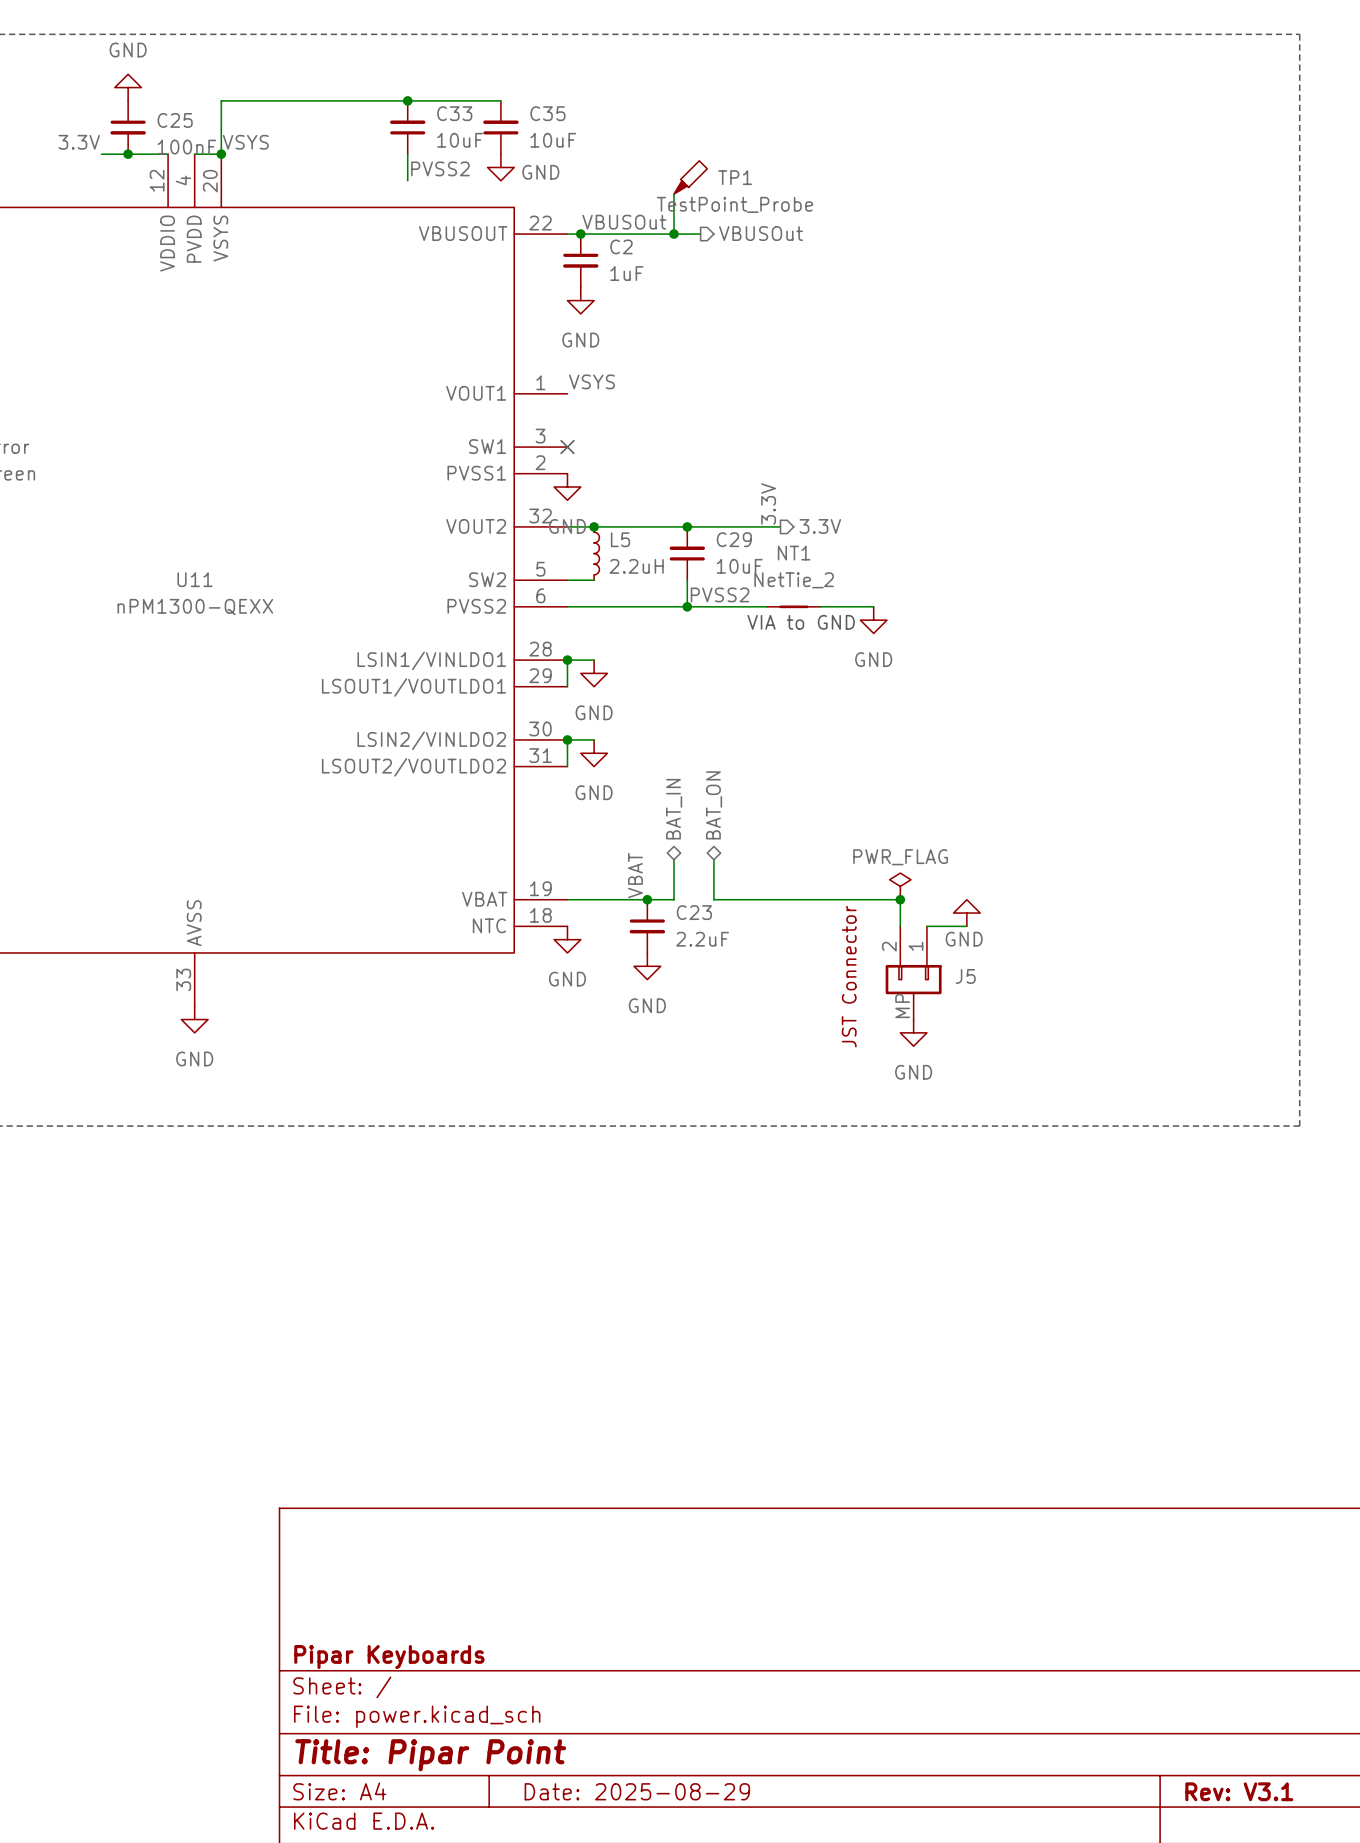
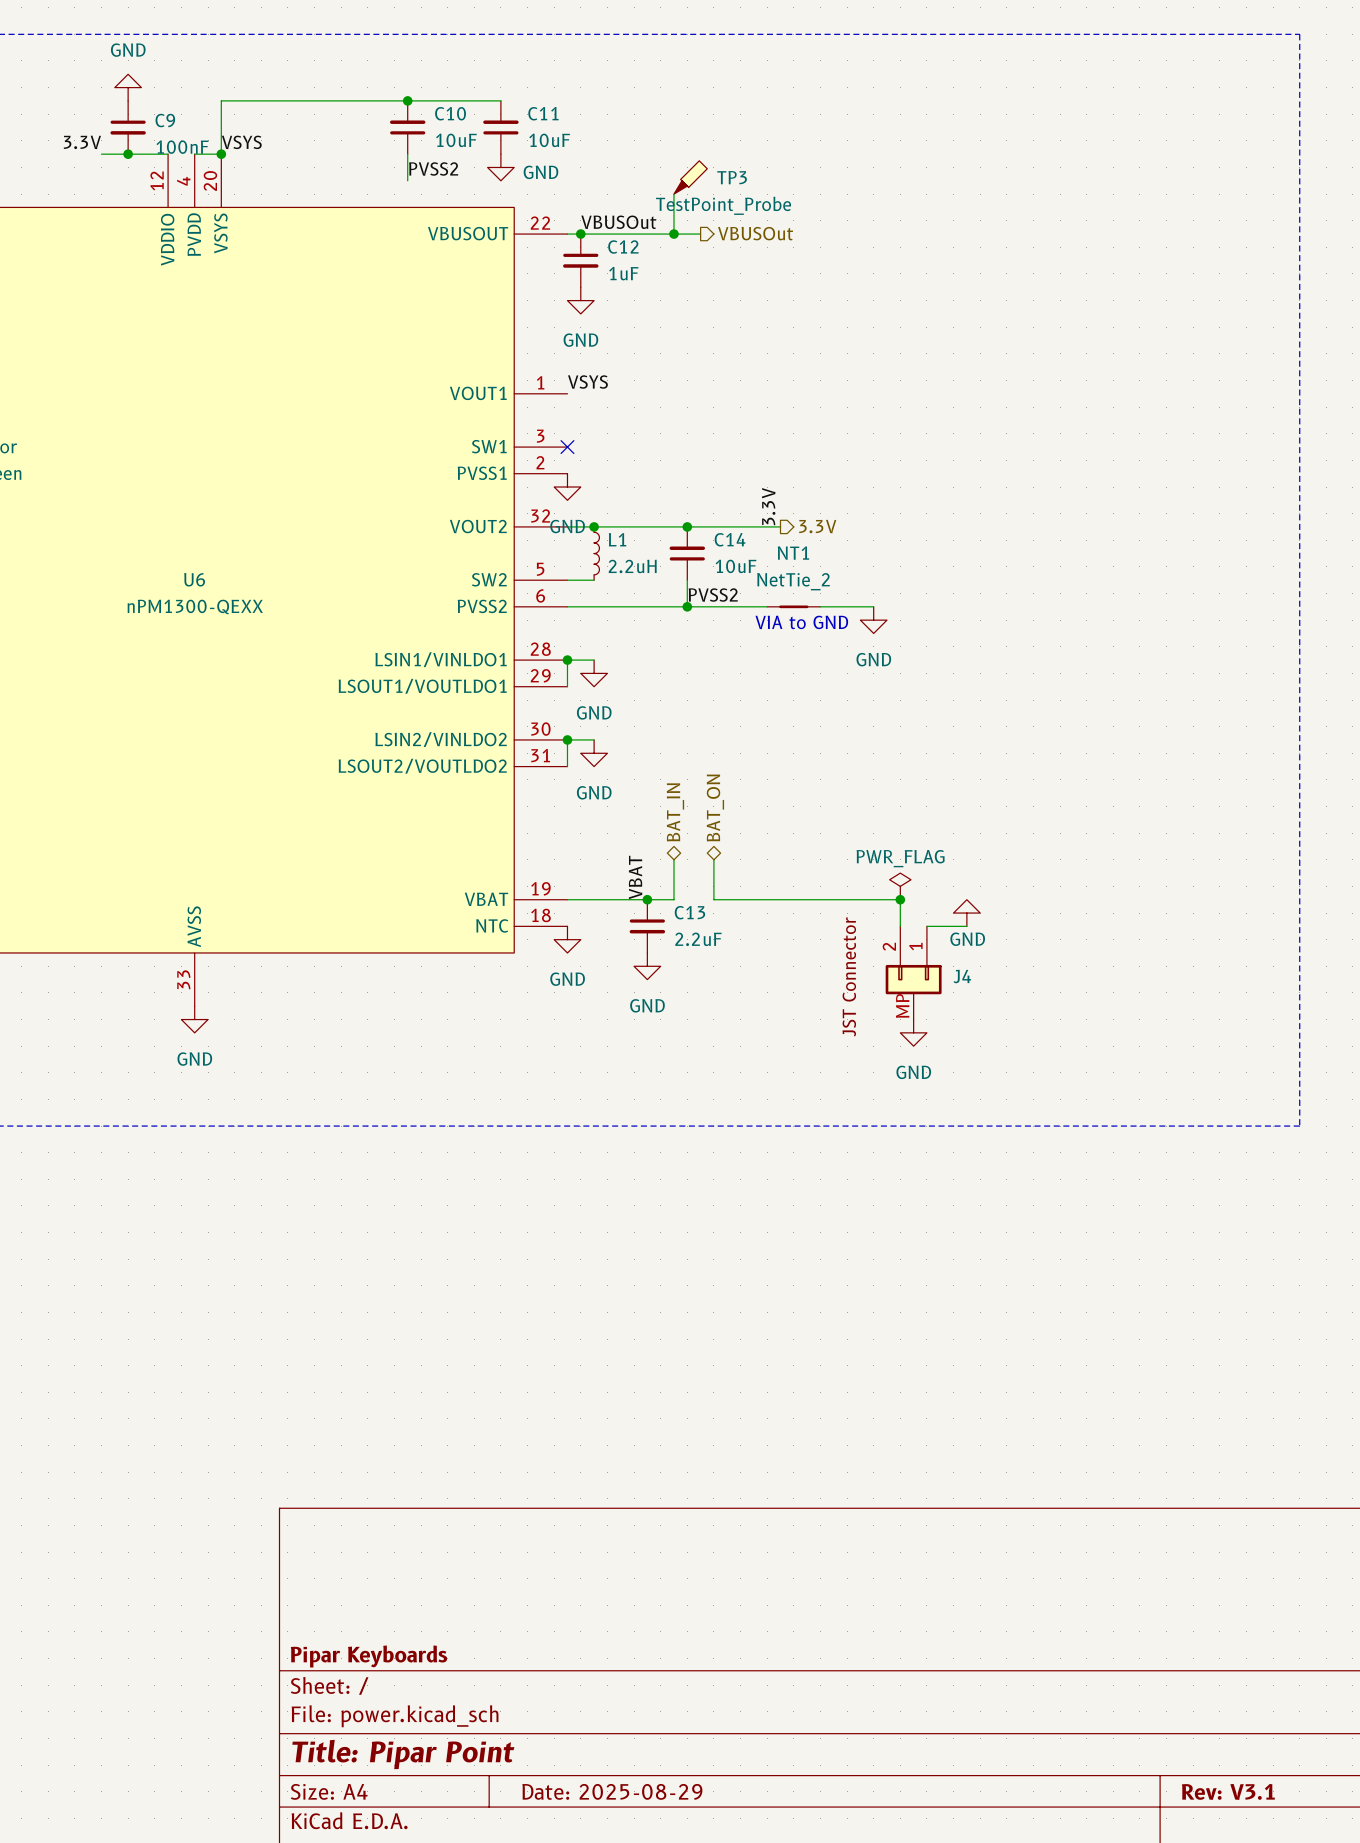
C33 name: C33 (454, 113) -> C10 (450, 113)
C35 name: C35 (547, 113) -> C11 (543, 113)
C25 name: C25 (175, 120) -> C9 (165, 120)
TP1 name: TP1 (735, 177) -> TP3 (732, 177)
C2 name: C2 (621, 246) -> C12 (623, 247)
L5 name: L5 (620, 539) -> L1 (617, 539)
C29 name: C29 (734, 539) -> C14 (730, 539)
U11 name: U11 (195, 579) -> U6 (194, 579)
C23 name: C23 (694, 912) -> C13 (689, 912)
J5 name: J5 (965, 976) -> J4 (962, 976)

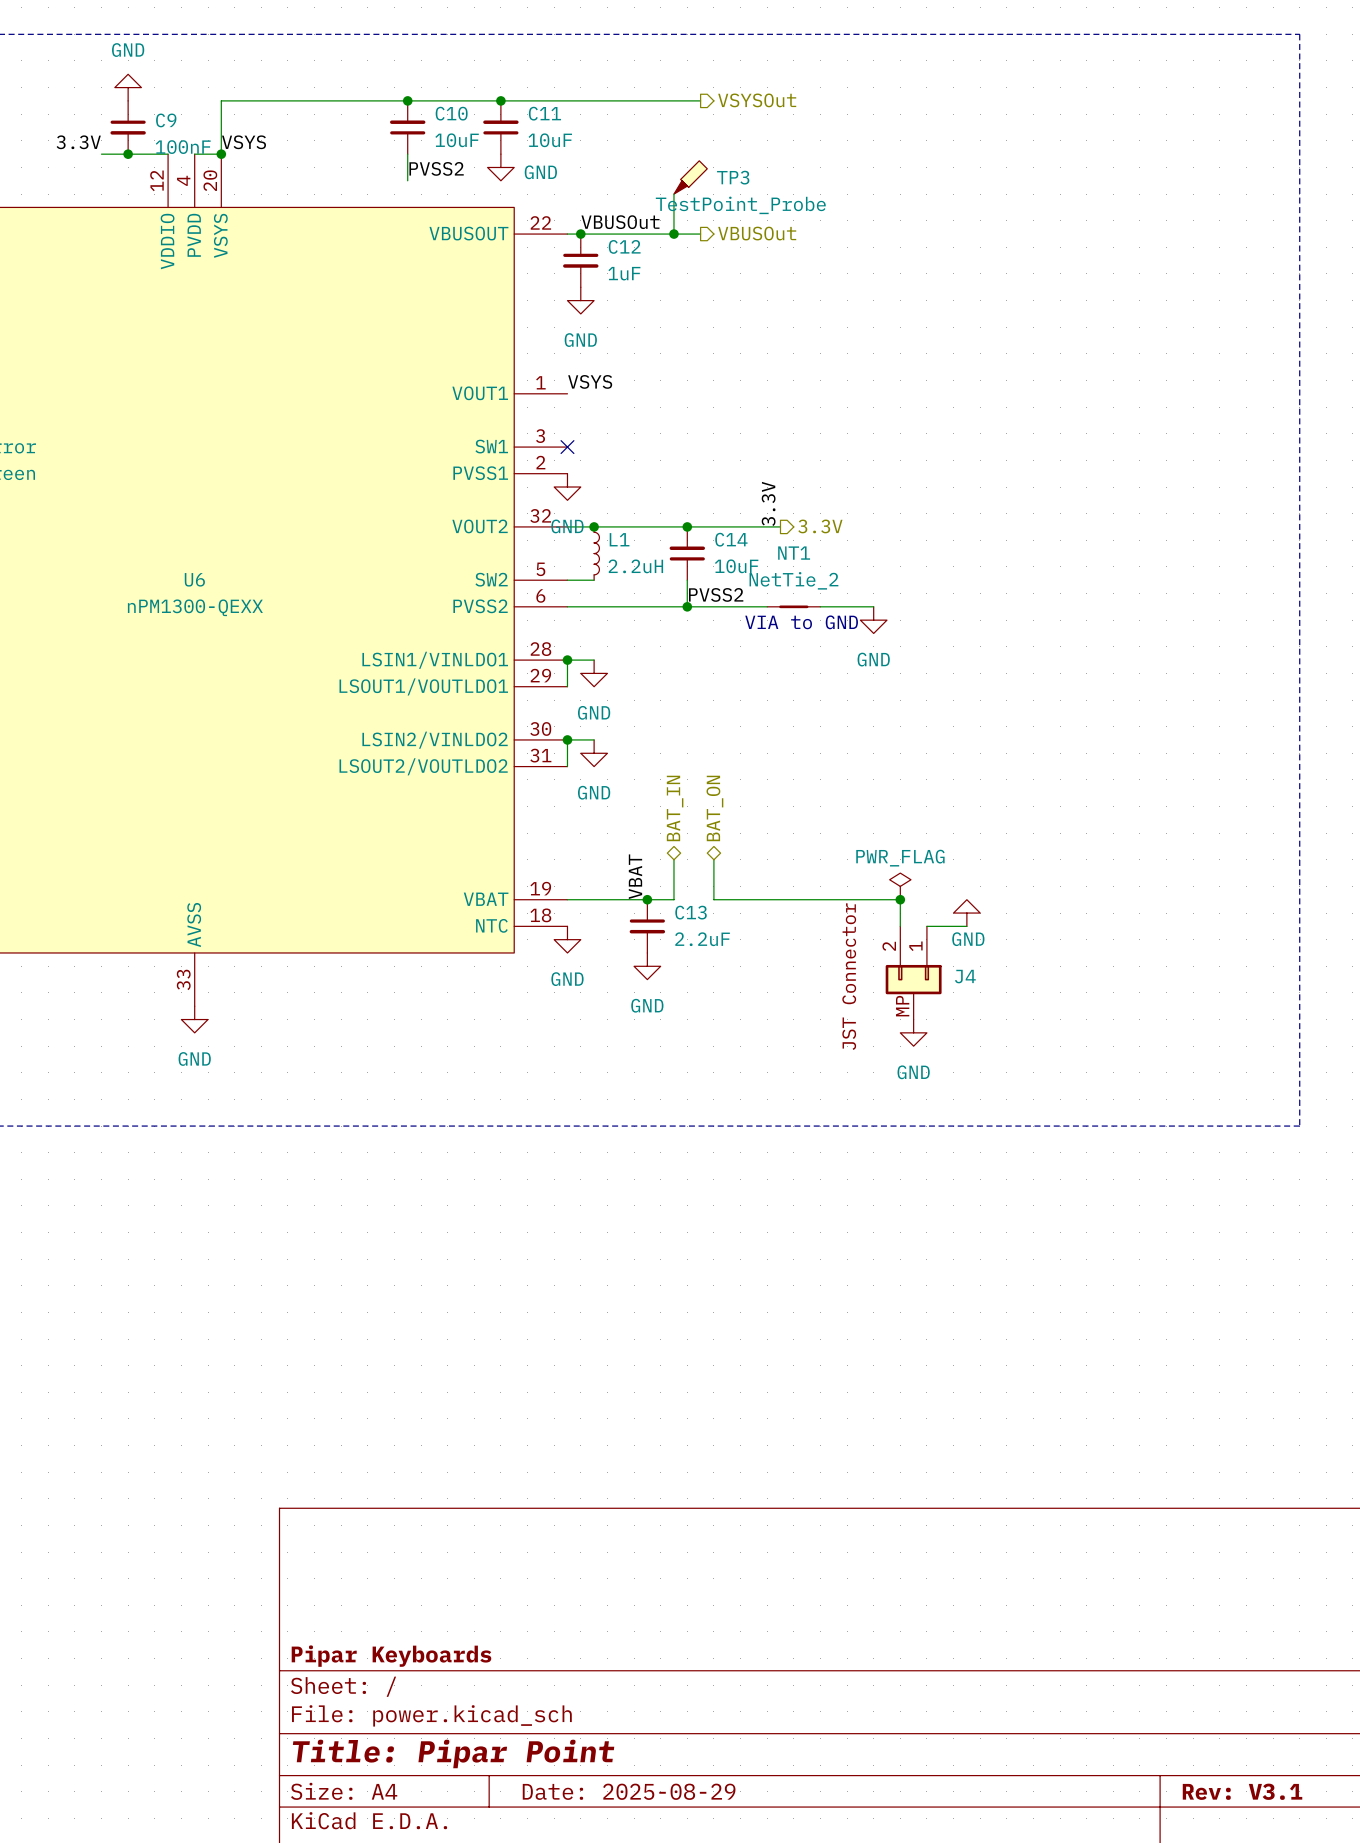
wire: none -> (500, 100) (700, 100)
junction: none -> (500, 100)
hierarchical label: none -> VSYSOut (757, 100)

